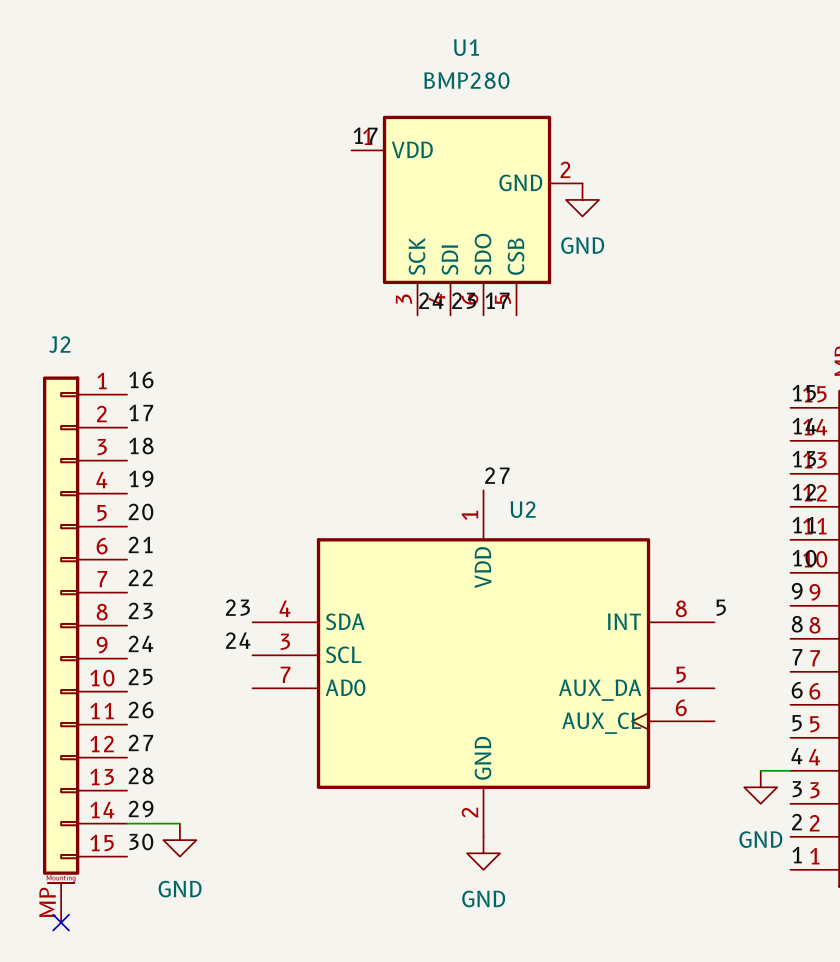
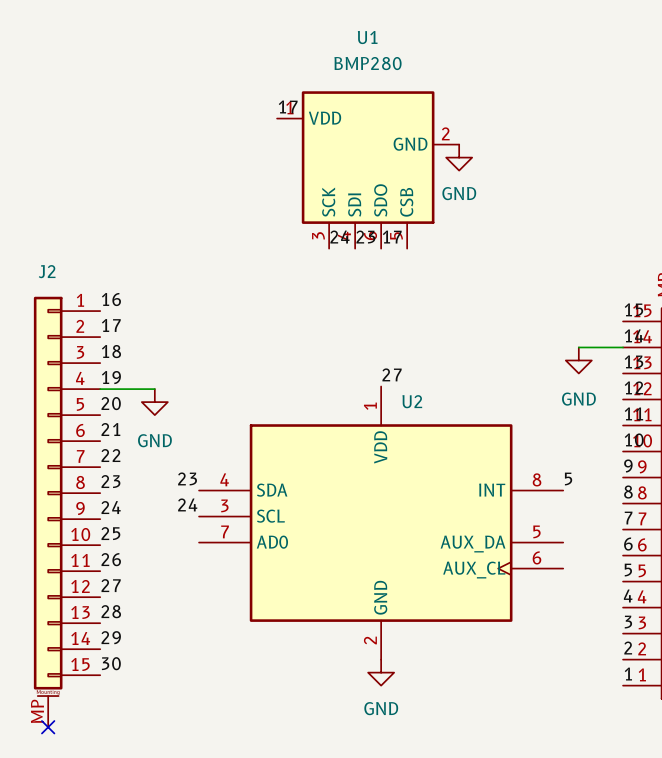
wire: none -> (578, 347) (623, 347)
power symbol: none -> GND (578, 360)
wire: none -> (100, 389) (154, 389)
power symbol: none -> GND (154, 402)
wire: (760, 770) (790, 770) -> none
power symbol: GND (760, 787) -> none
wire: (127, 823) (179, 823) -> none
power symbol: GND (179, 840) -> none

